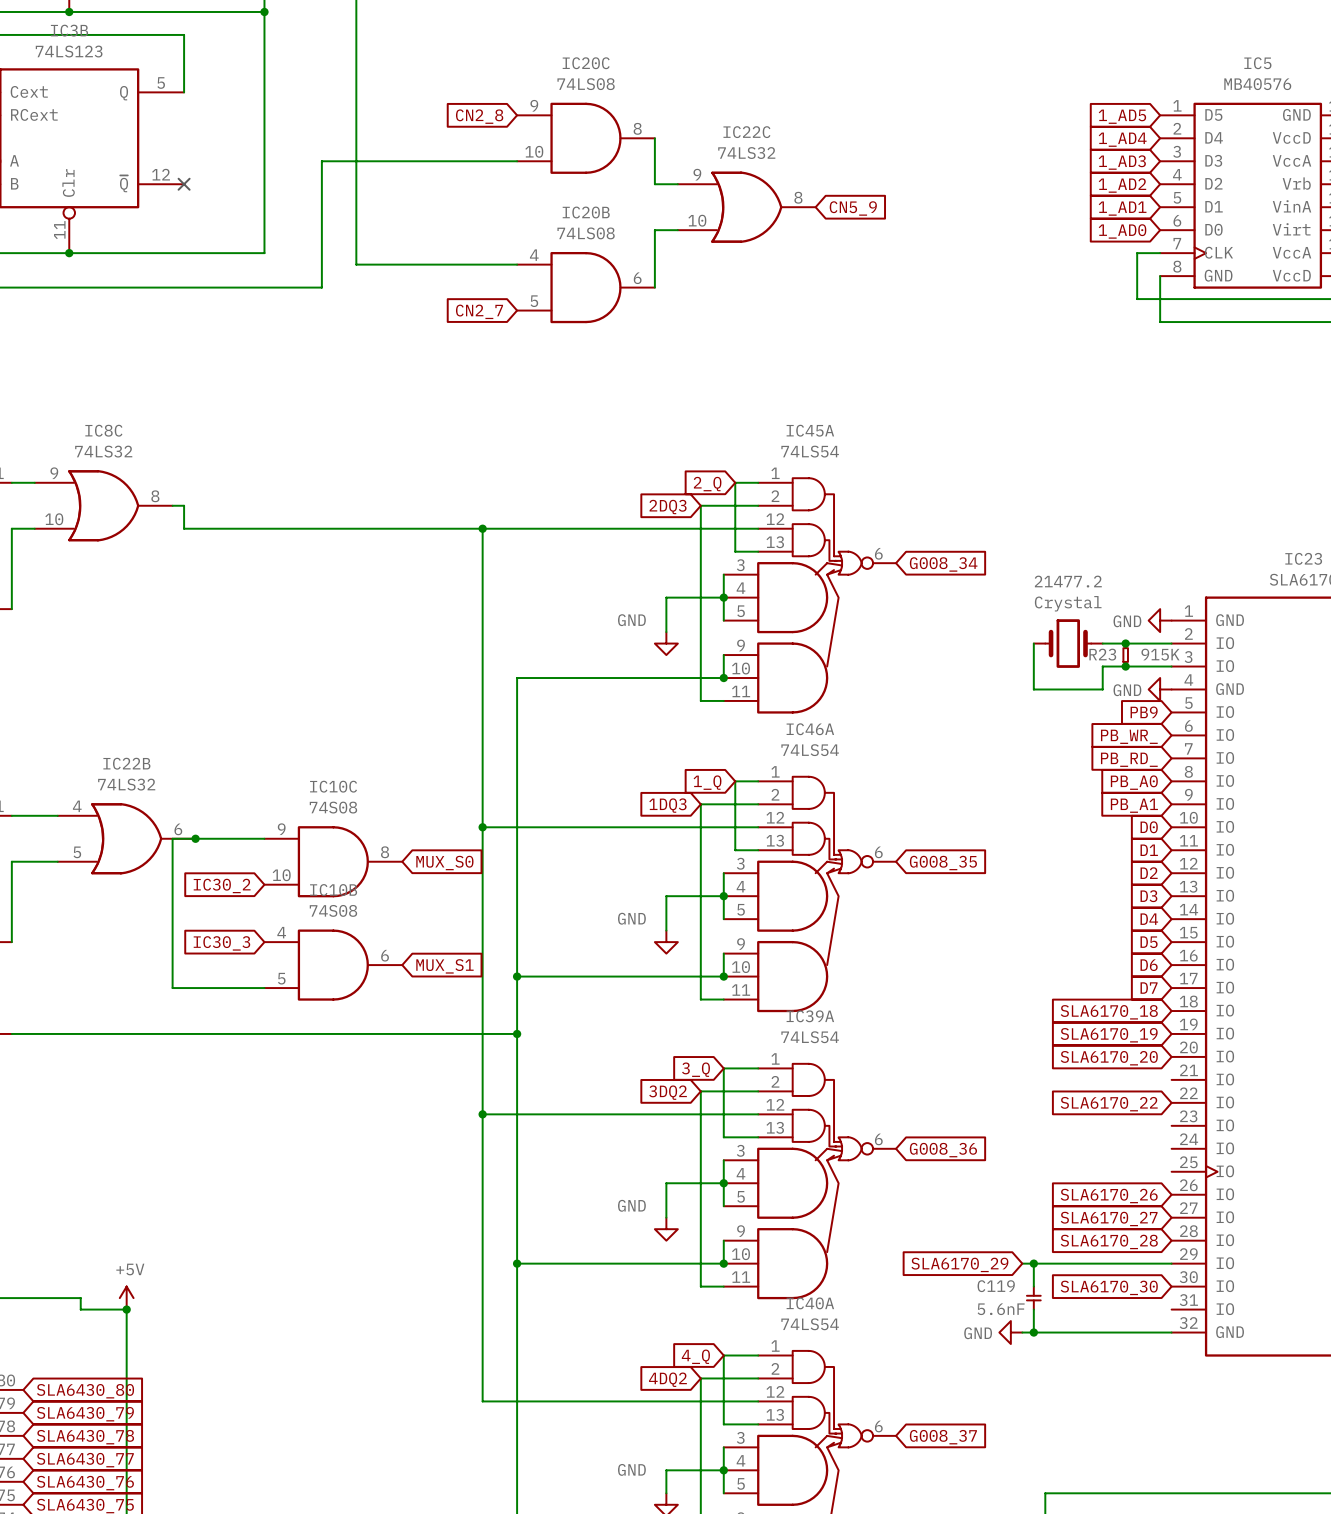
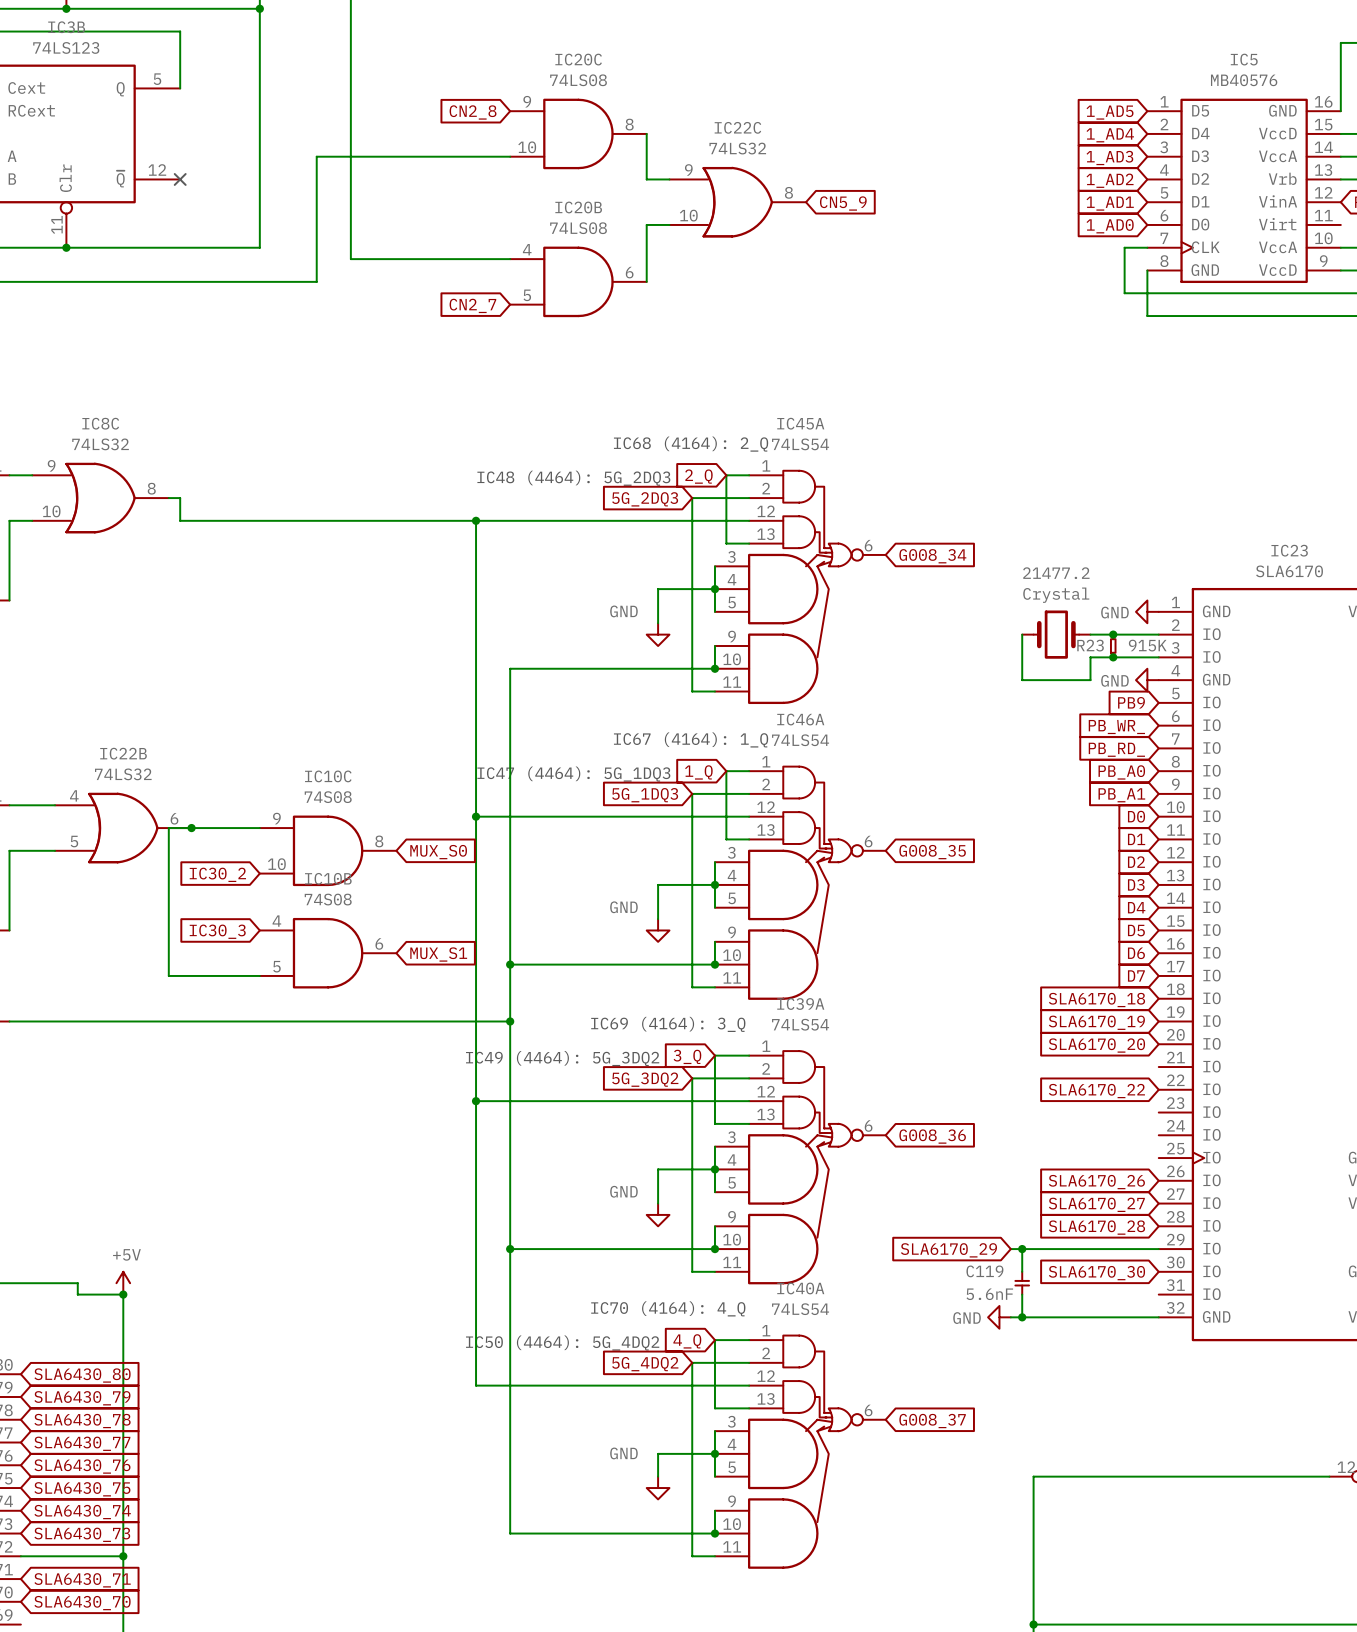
text: none -> IC68 (4164): 2_Q (691, 444)
text: none -> IC48 (4464): 5G_2DQ3 (573, 478)
global label: 2DQ3 (668, 507) -> 5G_2DQ3 (645, 499)
text: none -> IC67 (4164): 1_Q (691, 739)
text: none -> IC47 (4464): 5G_1DQ3 (573, 774)
global label: 1DQ3 (667, 805) -> 5G_1DQ3 (645, 795)
text: none -> IC69 (4164): 3_Q (668, 1024)
text: none -> IC49 (4464): 5G_3DQ2 (562, 1058)
global label: 3DQ2 (668, 1092) -> 5G_3DQ2 (645, 1079)
text: none -> IC70 (4164): 4_Q (668, 1308)
text: none -> IC50 (4464): 5G_4DQ2 (562, 1343)
global label: 4DQ2 (667, 1379) -> 5G_4DQ2 (645, 1364)

